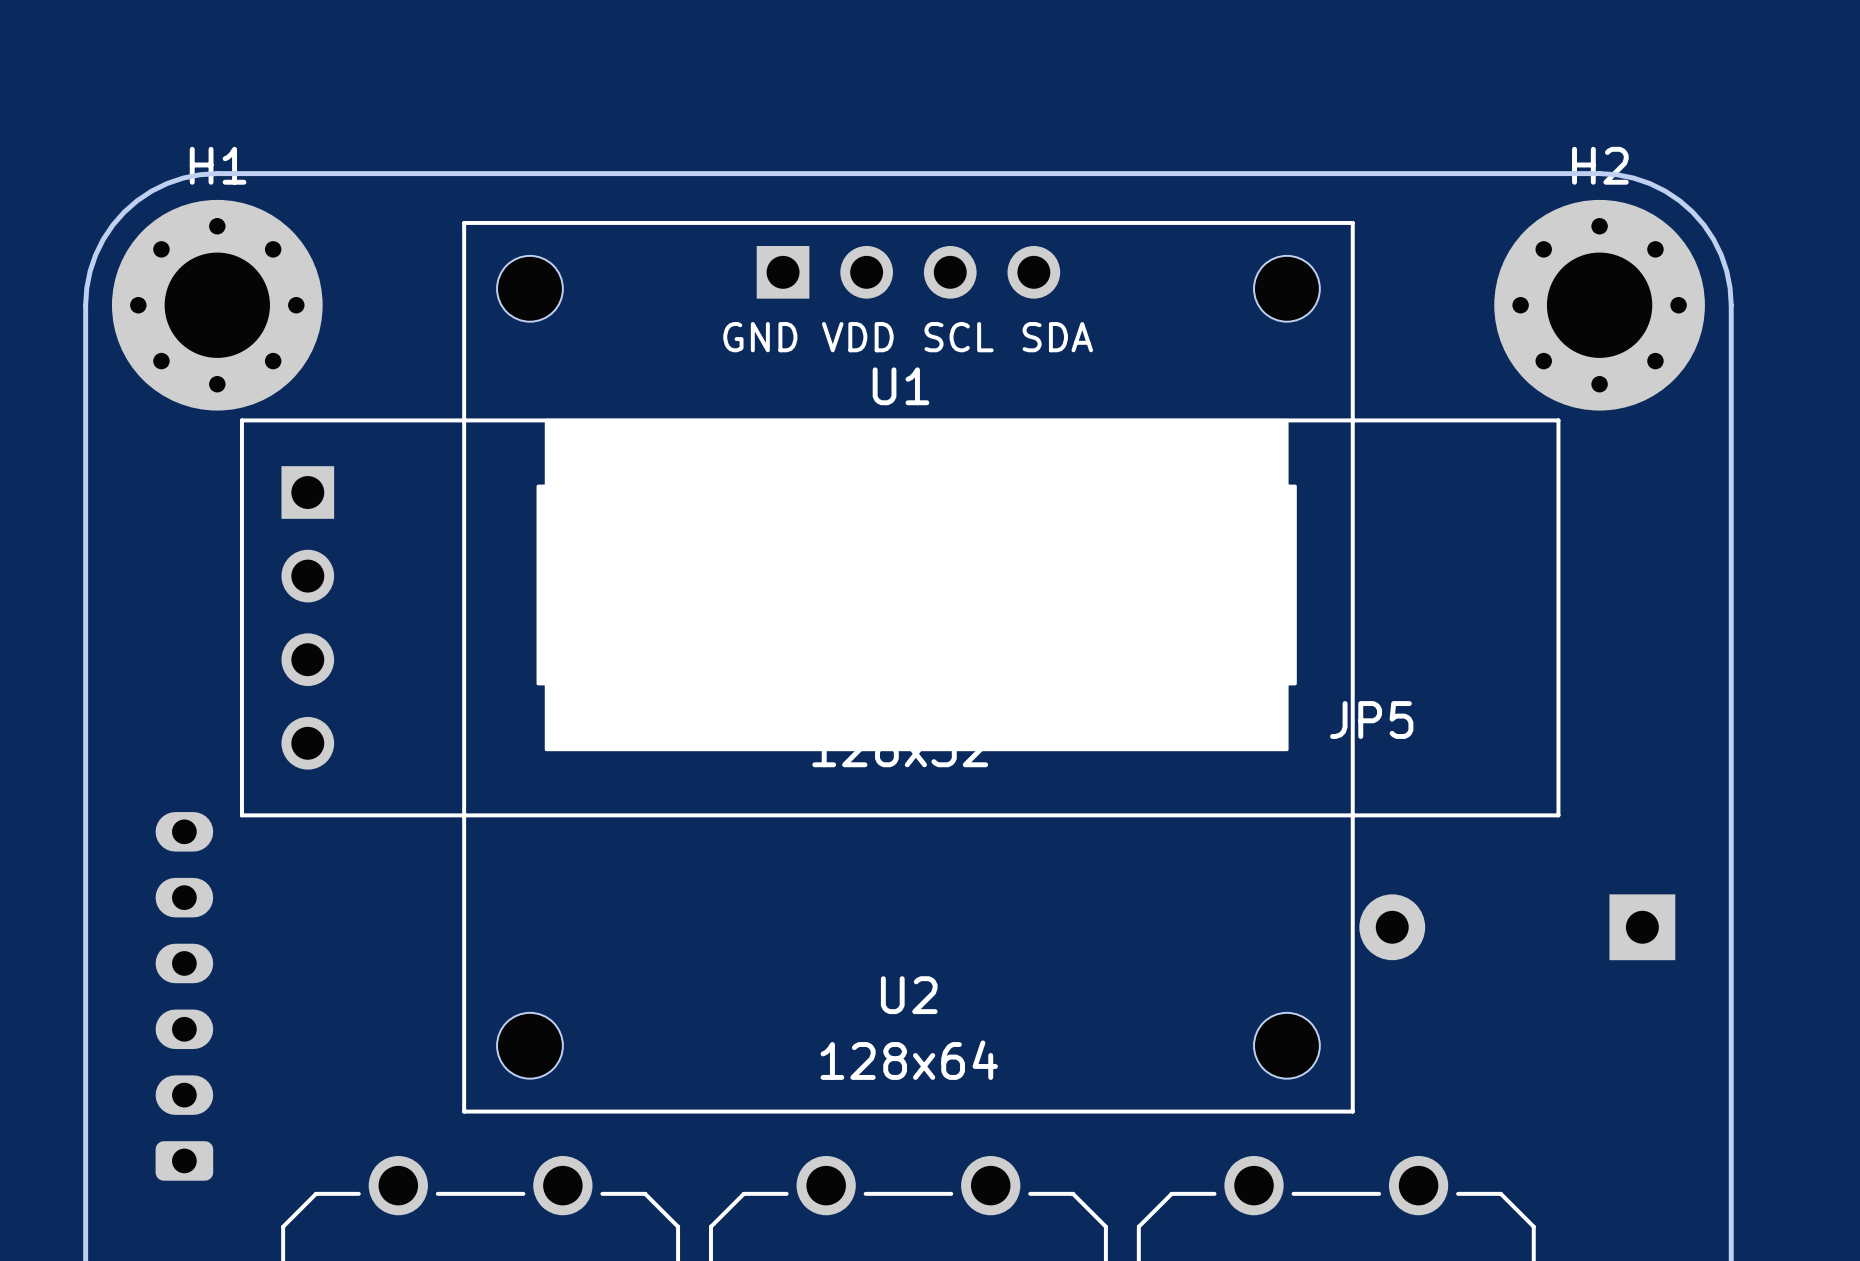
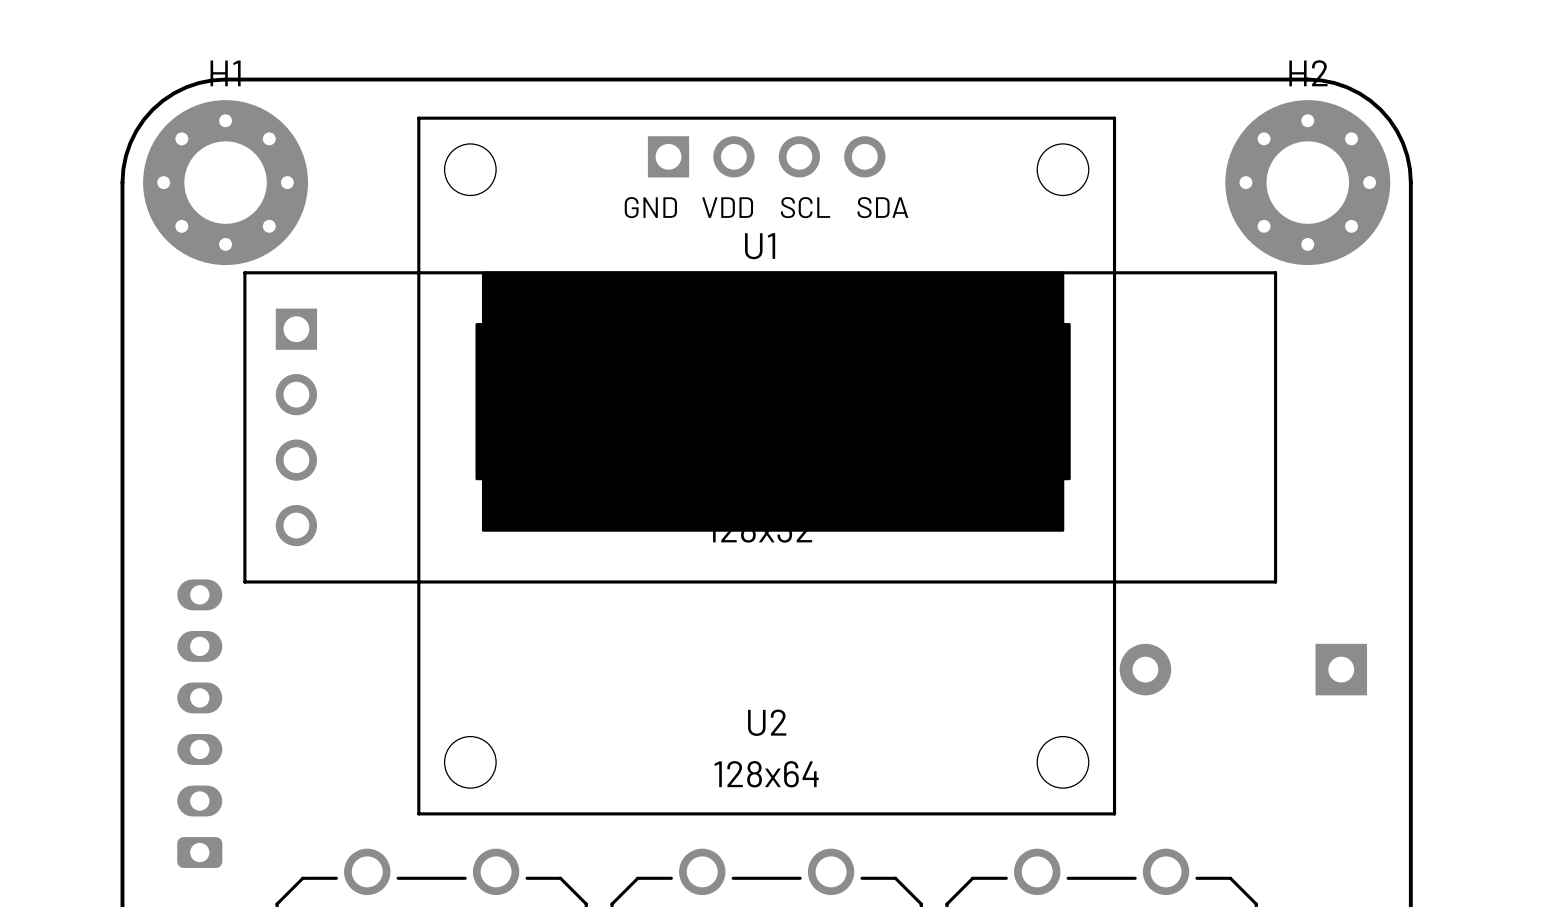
JP5: (1371, 720) -> none

